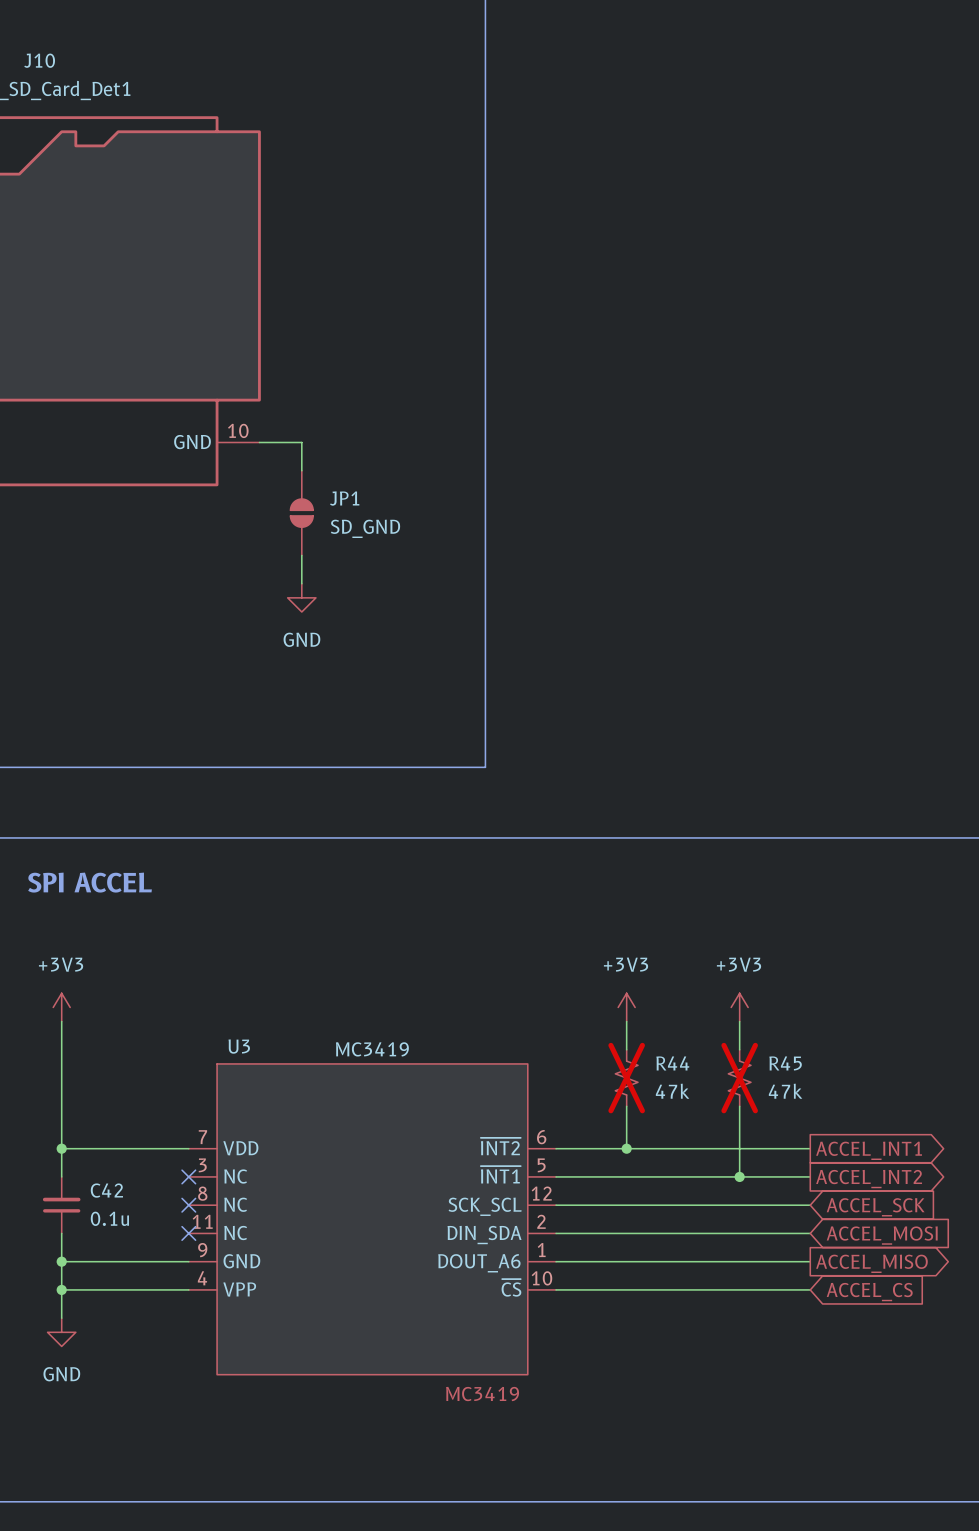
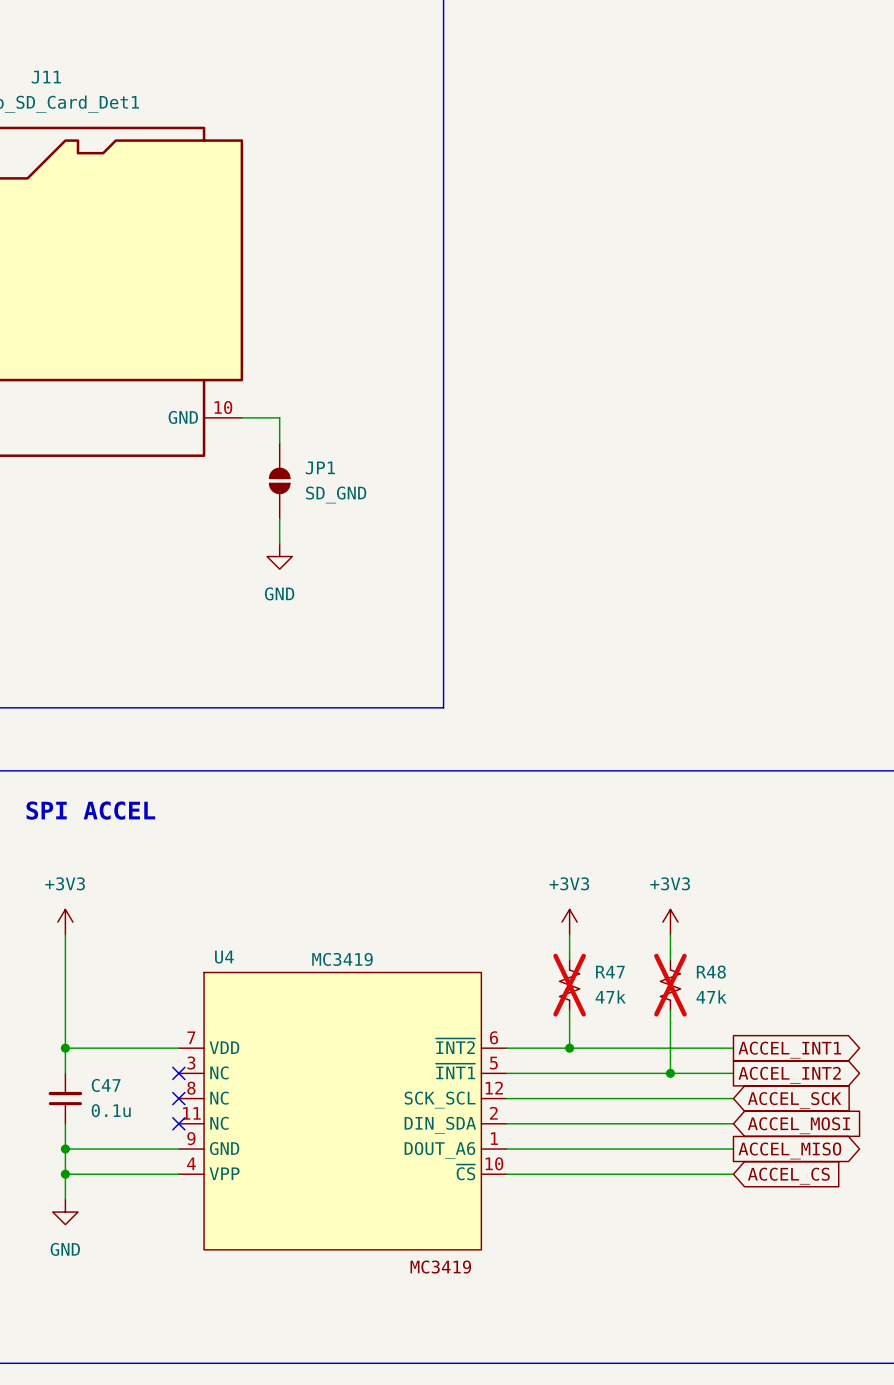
J10 name: J10 (39, 60) -> J11 (46, 77)
U3 name: U3 (239, 1046) -> U4 (224, 957)
R44 name: R44 (672, 1063) -> R47 (610, 972)
R45 name: R45 (785, 1063) -> R48 (711, 972)
C42 name: C42 (106, 1190) -> C47 (106, 1085)

